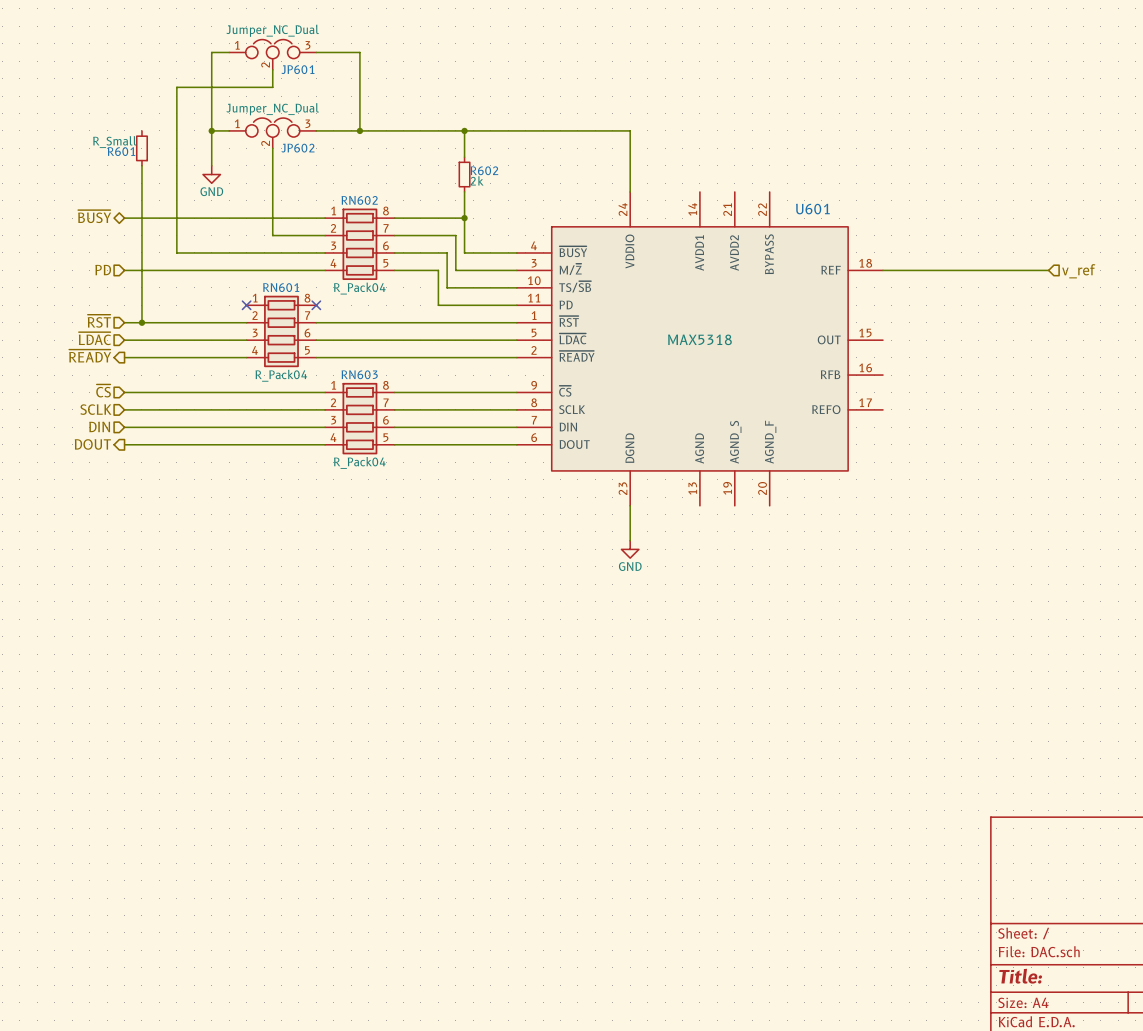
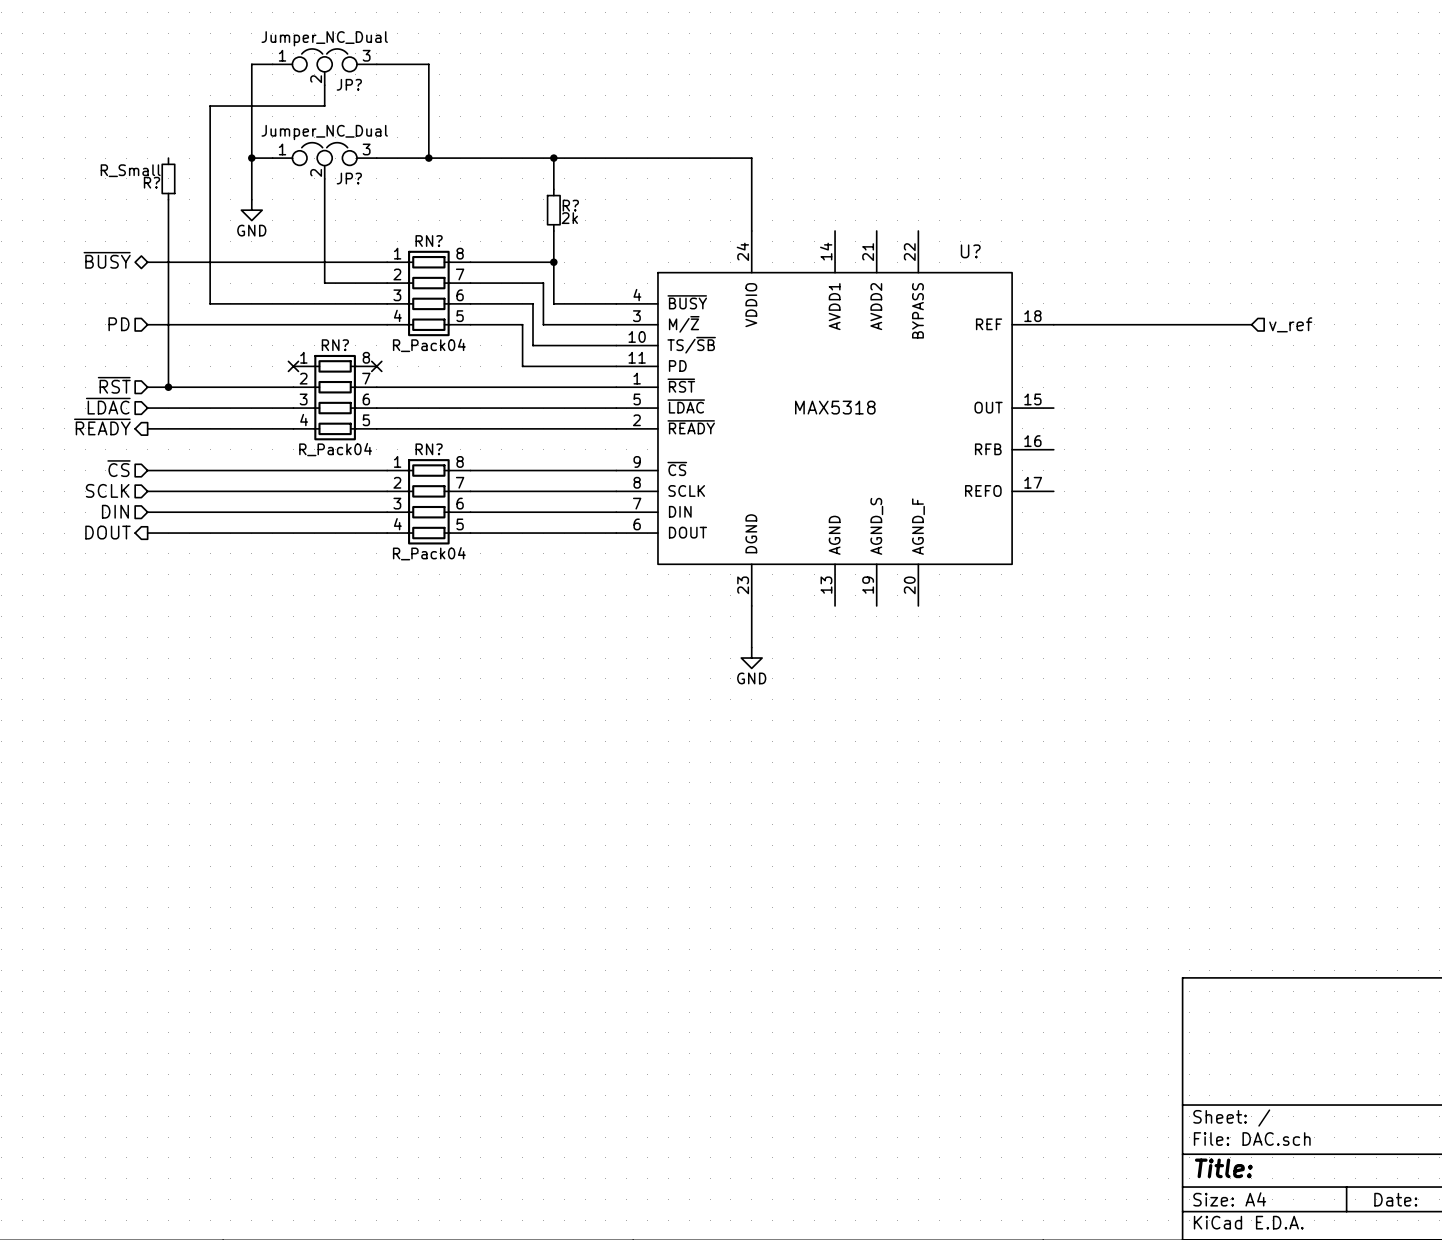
JP601 name: JP601 (297, 69) -> JP? (349, 84)
JP602 name: JP602 (297, 148) -> JP? (349, 178)
R601 name: R601 (121, 151) -> R? (151, 182)
R602 name: R602 (484, 170) -> R? (570, 205)
RN602 name: RN602 (359, 200) -> RN? (429, 241)
U601 name: U601 (812, 209) -> U? (970, 251)
RN601 name: RN601 (281, 287) -> RN? (335, 345)
RN603 name: RN603 (359, 374) -> RN? (429, 449)

